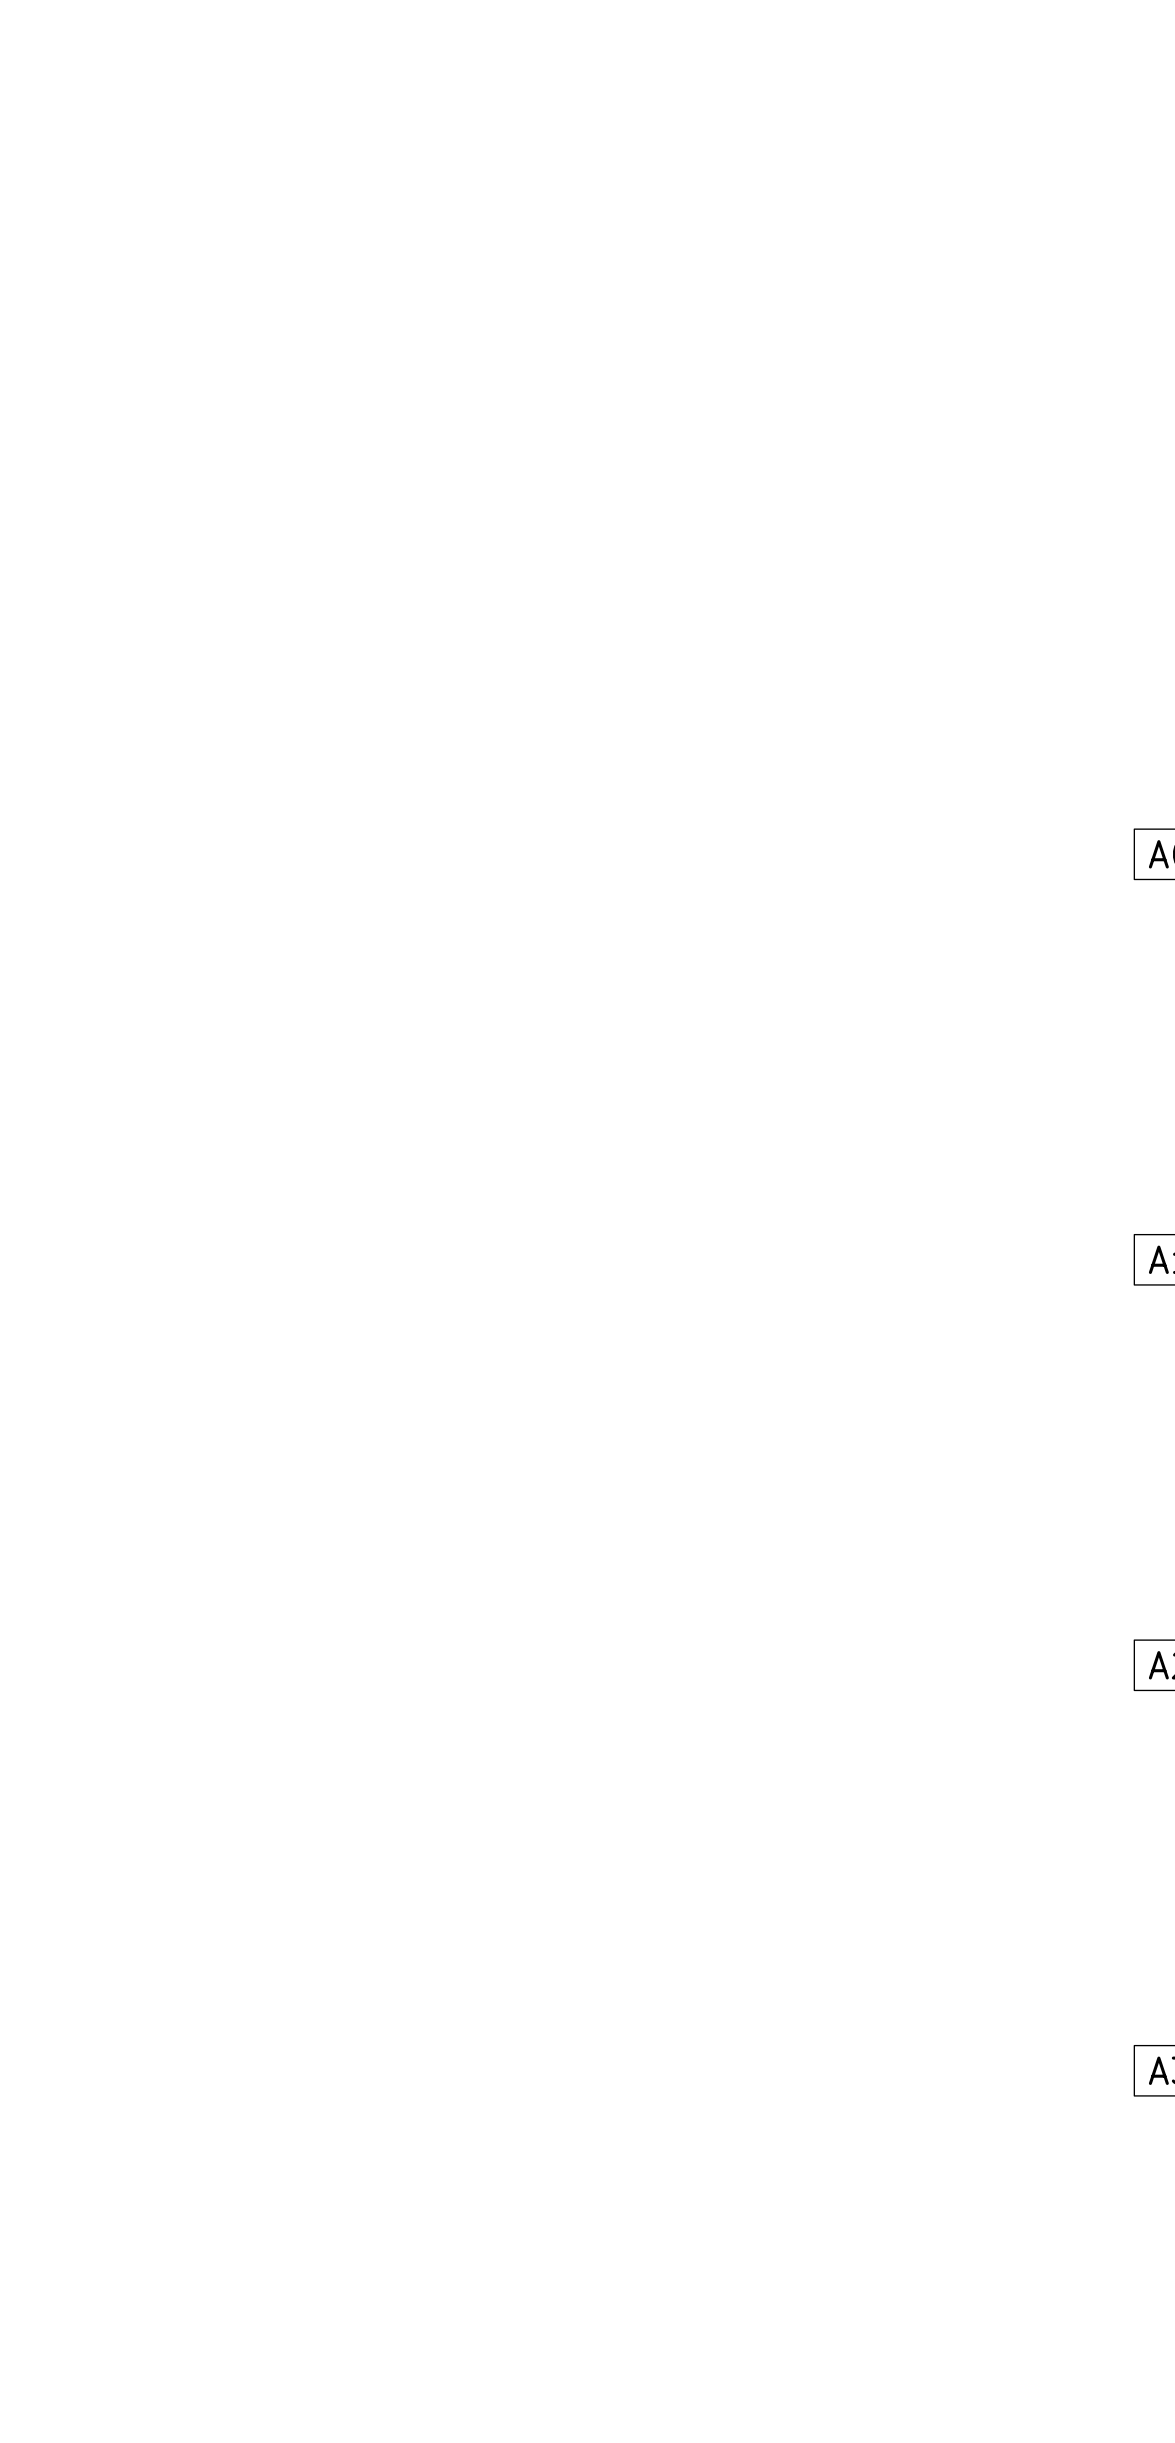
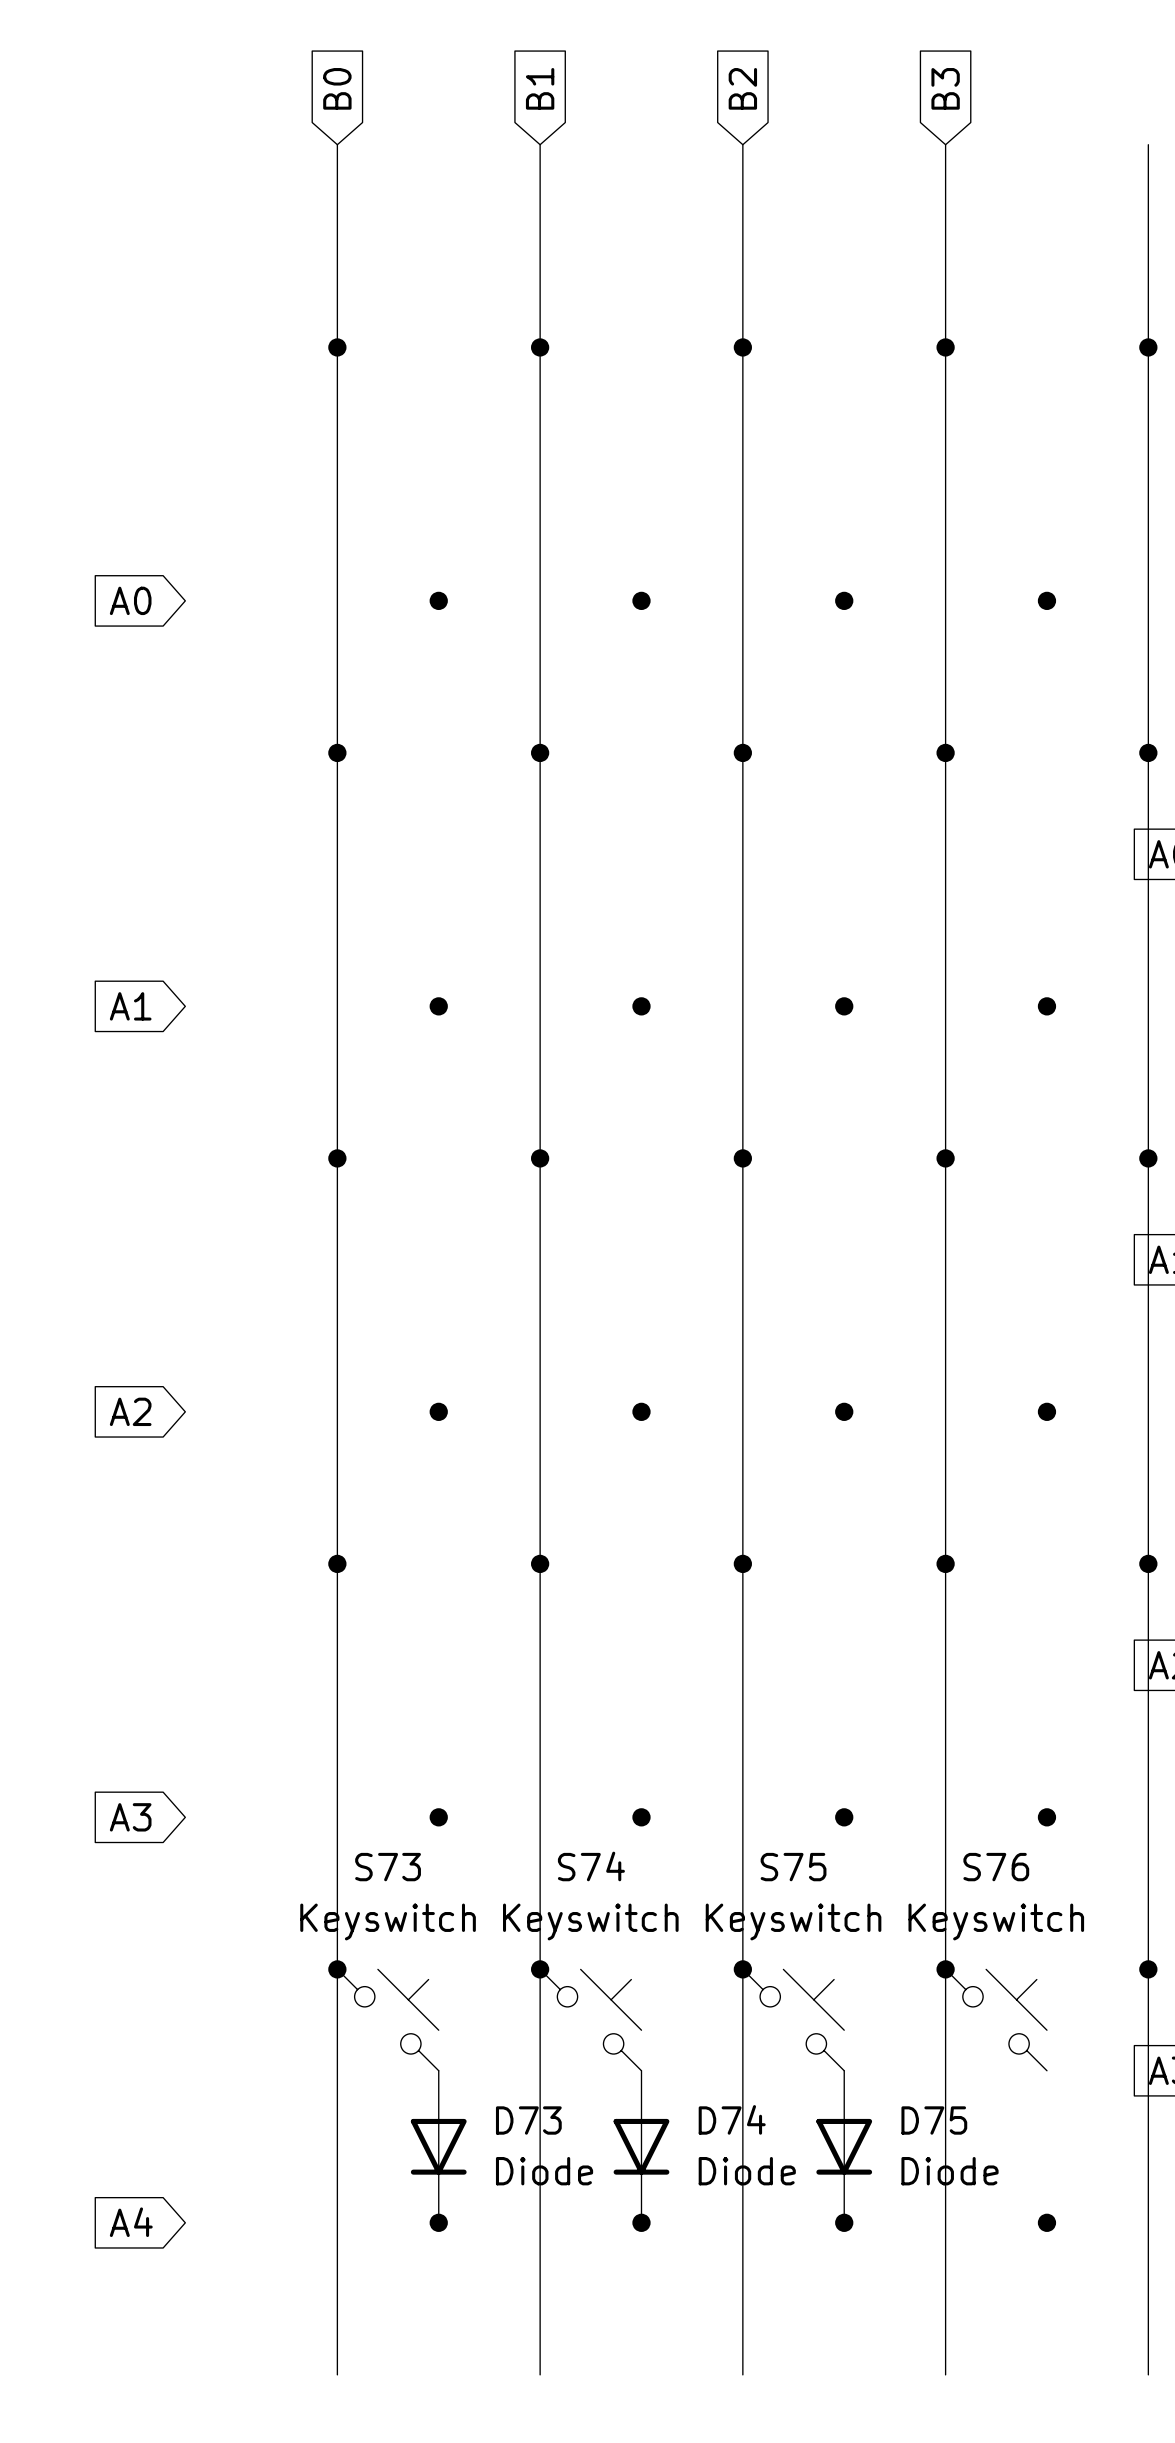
global label: none -> B0 (337, 88)
global label: none -> B1 (540, 88)
global label: none -> B2 (742, 88)
global label: none -> B3 (945, 88)
wire: none -> (337, 144) (337, 2374)
wire: none -> (540, 144) (540, 2374)
wire: none -> (742, 144) (742, 2374)
wire: none -> (945, 144) (945, 2374)
wire: none -> (1148, 144) (1148, 2374)
junction: none -> (337, 347)
junction: none -> (540, 347)
junction: none -> (742, 347)
junction: none -> (945, 347)
junction: none -> (1148, 347)
global label: none -> A0 (130, 600)
junction: none -> (438, 600)
junction: none -> (641, 600)
junction: none -> (844, 600)
junction: none -> (1046, 600)
junction: none -> (337, 752)
junction: none -> (540, 752)
junction: none -> (742, 752)
junction: none -> (945, 752)
junction: none -> (1148, 752)
global label: none -> A1 (130, 1006)
junction: none -> (438, 1006)
junction: none -> (641, 1006)
junction: none -> (844, 1006)
junction: none -> (1046, 1006)
junction: none -> (337, 1158)
junction: none -> (540, 1158)
junction: none -> (742, 1158)
junction: none -> (945, 1158)
junction: none -> (1148, 1158)
global label: none -> A2 (130, 1411)
junction: none -> (438, 1411)
junction: none -> (641, 1411)
junction: none -> (844, 1411)
junction: none -> (1046, 1411)
junction: none -> (337, 1563)
junction: none -> (540, 1563)
junction: none -> (742, 1563)
junction: none -> (945, 1563)
junction: none -> (1148, 1563)
global label: none -> A3 (130, 1817)
junction: none -> (438, 1817)
junction: none -> (641, 1817)
junction: none -> (844, 1817)
junction: none -> (1046, 1817)
junction: none -> (337, 1969)
junction: none -> (540, 1969)
junction: none -> (742, 1969)
junction: none -> (945, 1969)
junction: none -> (1148, 1969)
S73: none -> Keyswitch (388, 2020)
S74: none -> Keyswitch (590, 2020)
S75: none -> Keyswitch (793, 2020)
S76: none -> Keyswitch (996, 2020)
D73: none -> Diode (438, 2146)
D74: none -> Diode (641, 2146)
D75: none -> Diode (844, 2146)
global label: none -> A4 (131, 2222)
junction: none -> (438, 2222)
junction: none -> (641, 2222)
junction: none -> (844, 2222)
junction: none -> (1046, 2222)

